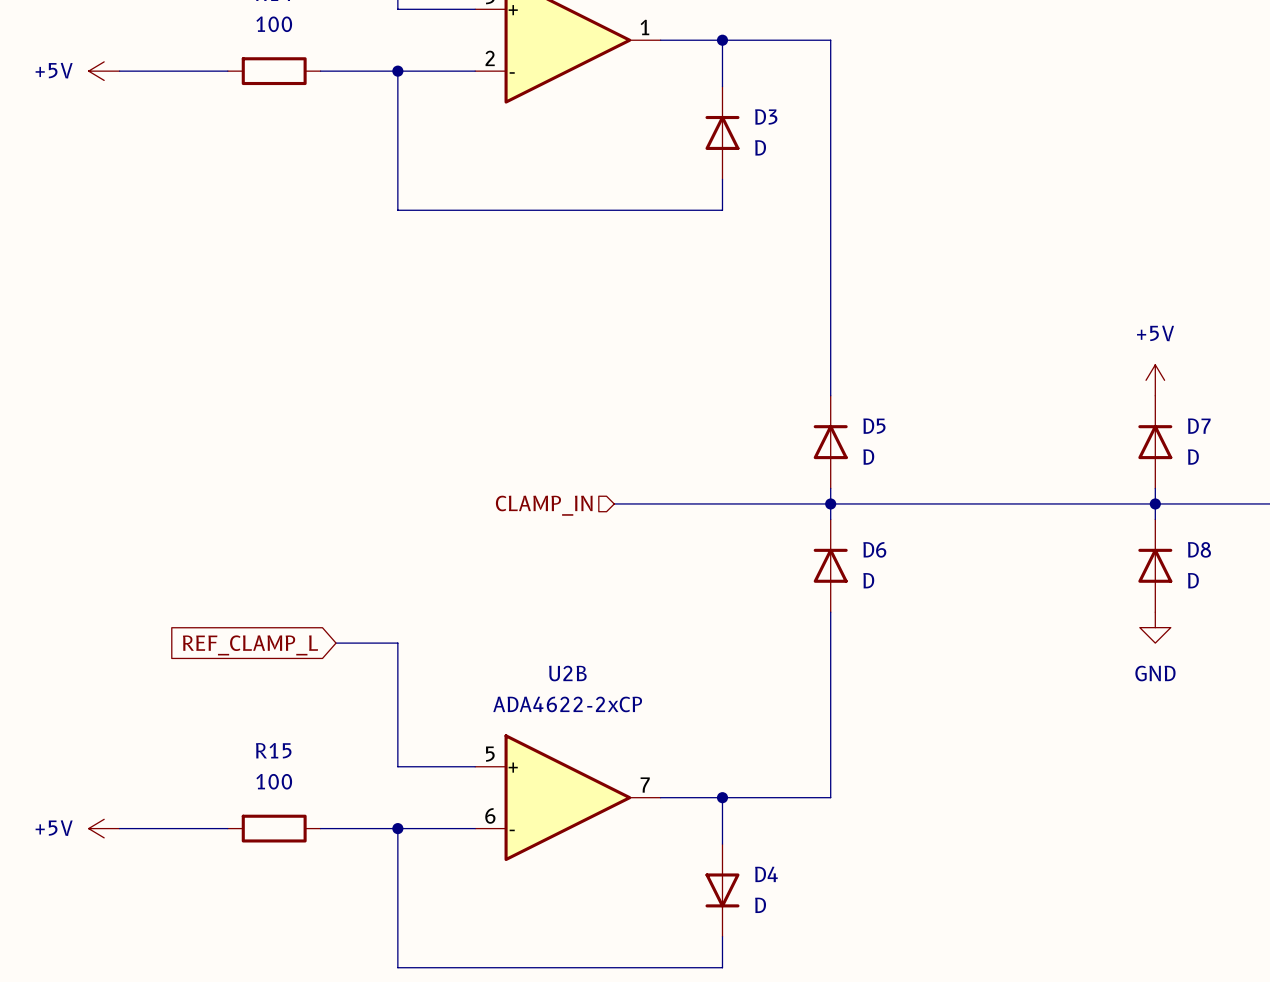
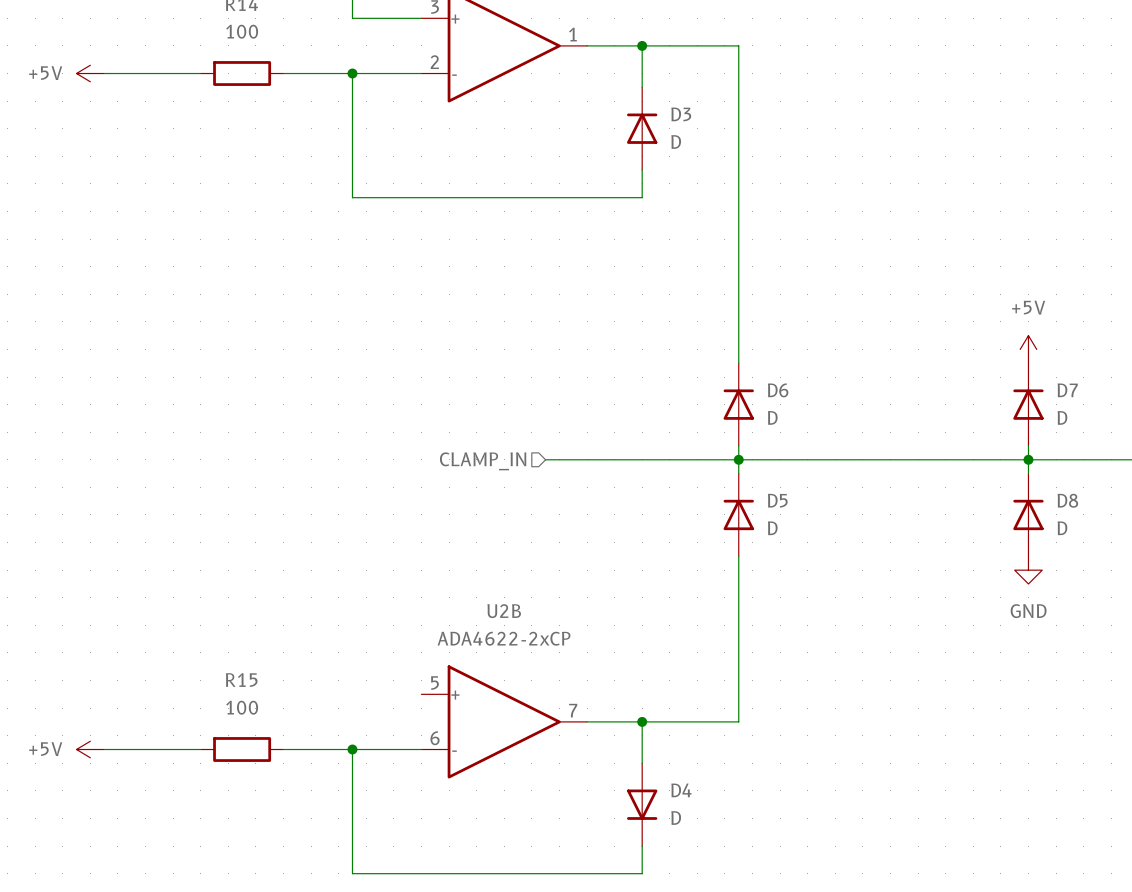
D5 name: D5 (874, 426) -> D6 (778, 390)
D6 name: D6 (874, 549) -> D5 (777, 500)
wire: (336, 643) (397, 643) (397, 766) (475, 766) -> none
global label: REF_CLAMP_L (250, 645) -> none

